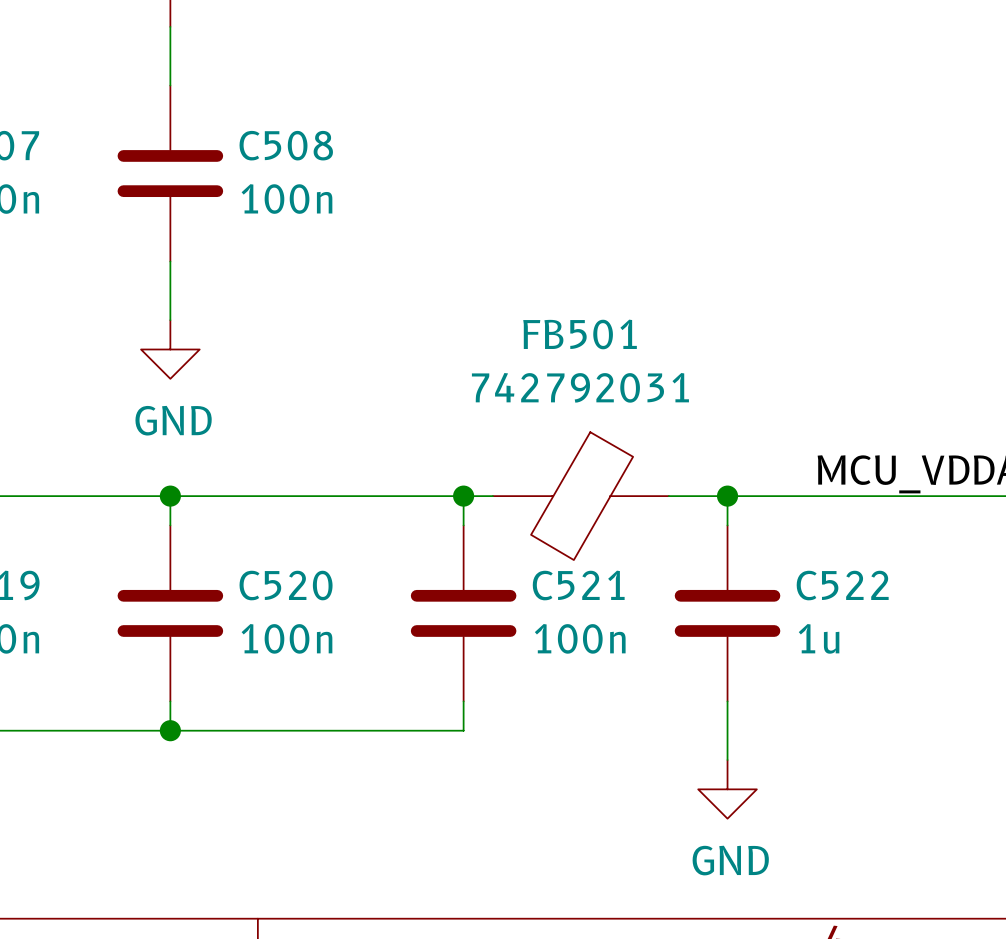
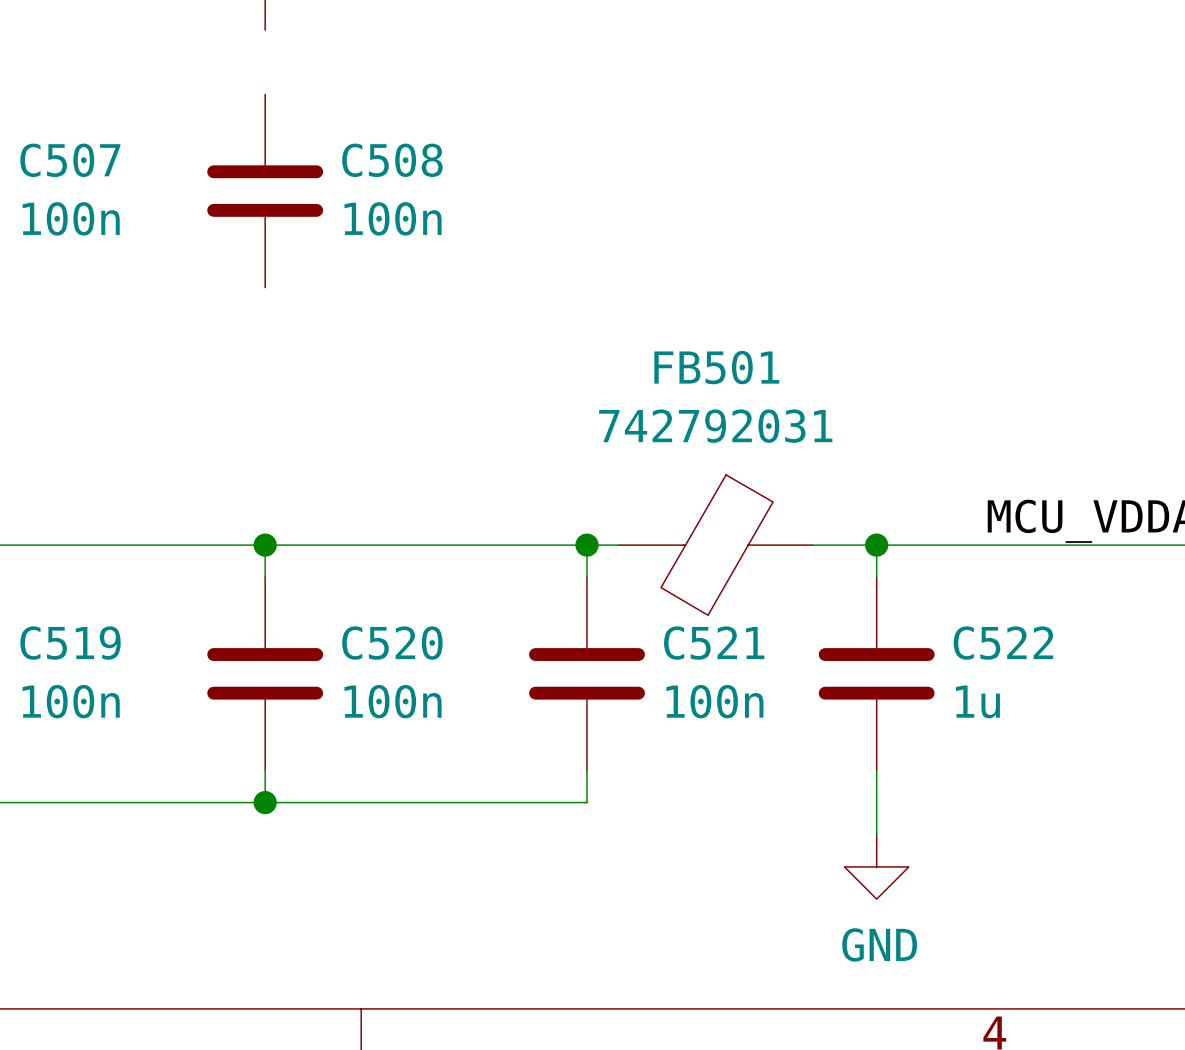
wire: (170, 26) (170, 85) -> none
wire: (170, 261) (170, 320) -> none
power symbol: GND (170, 349) -> none

